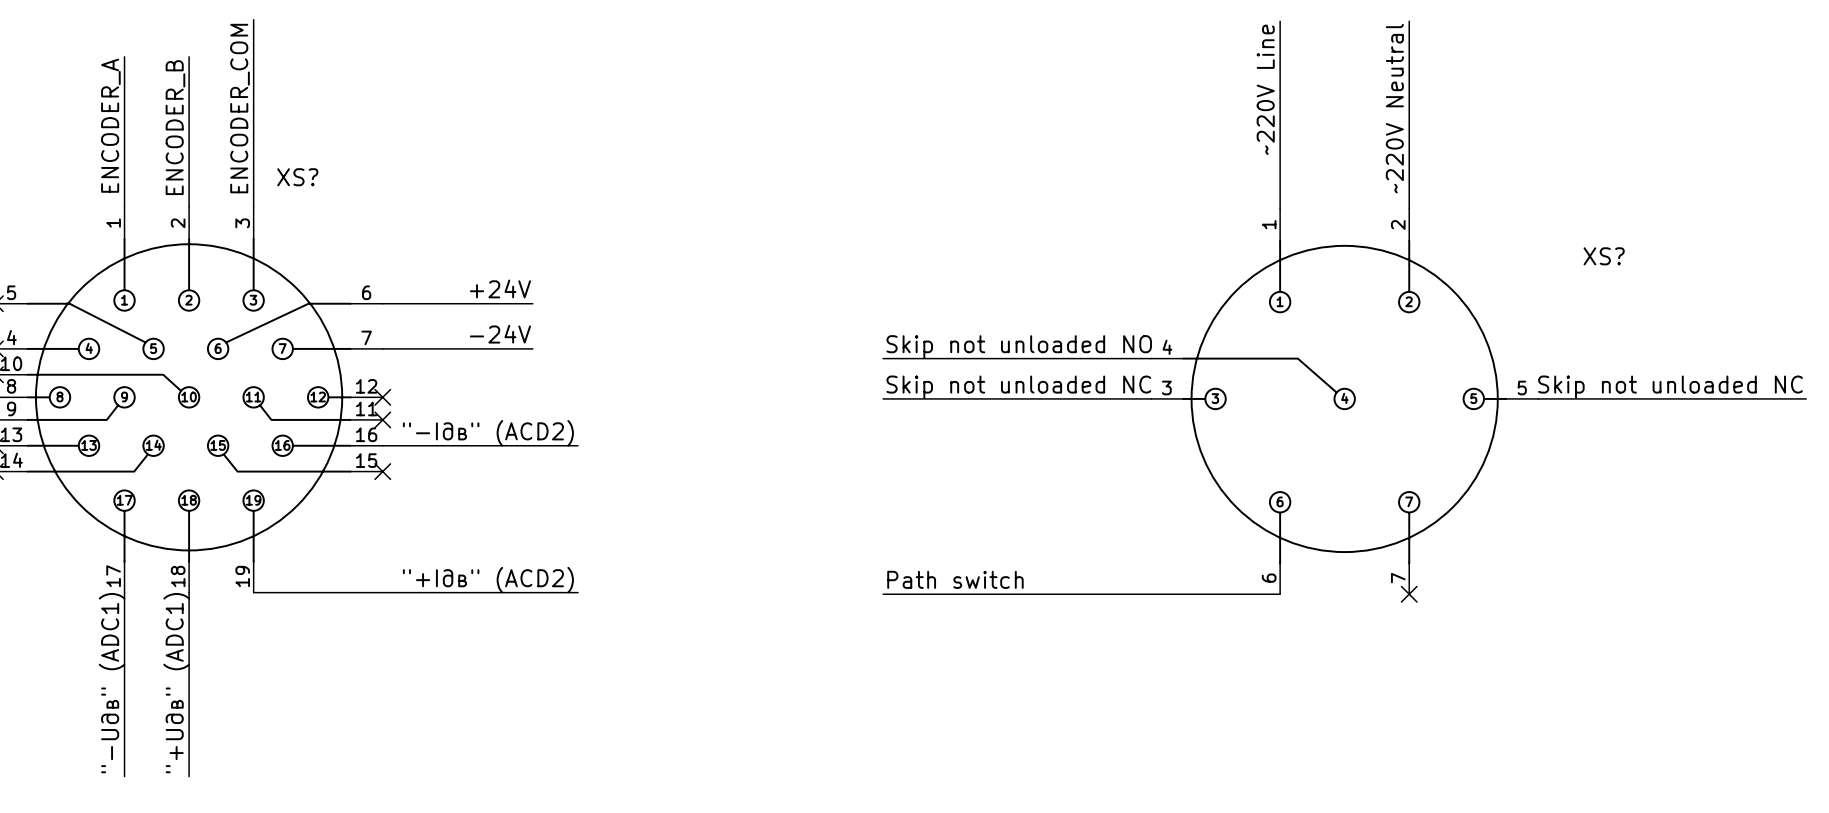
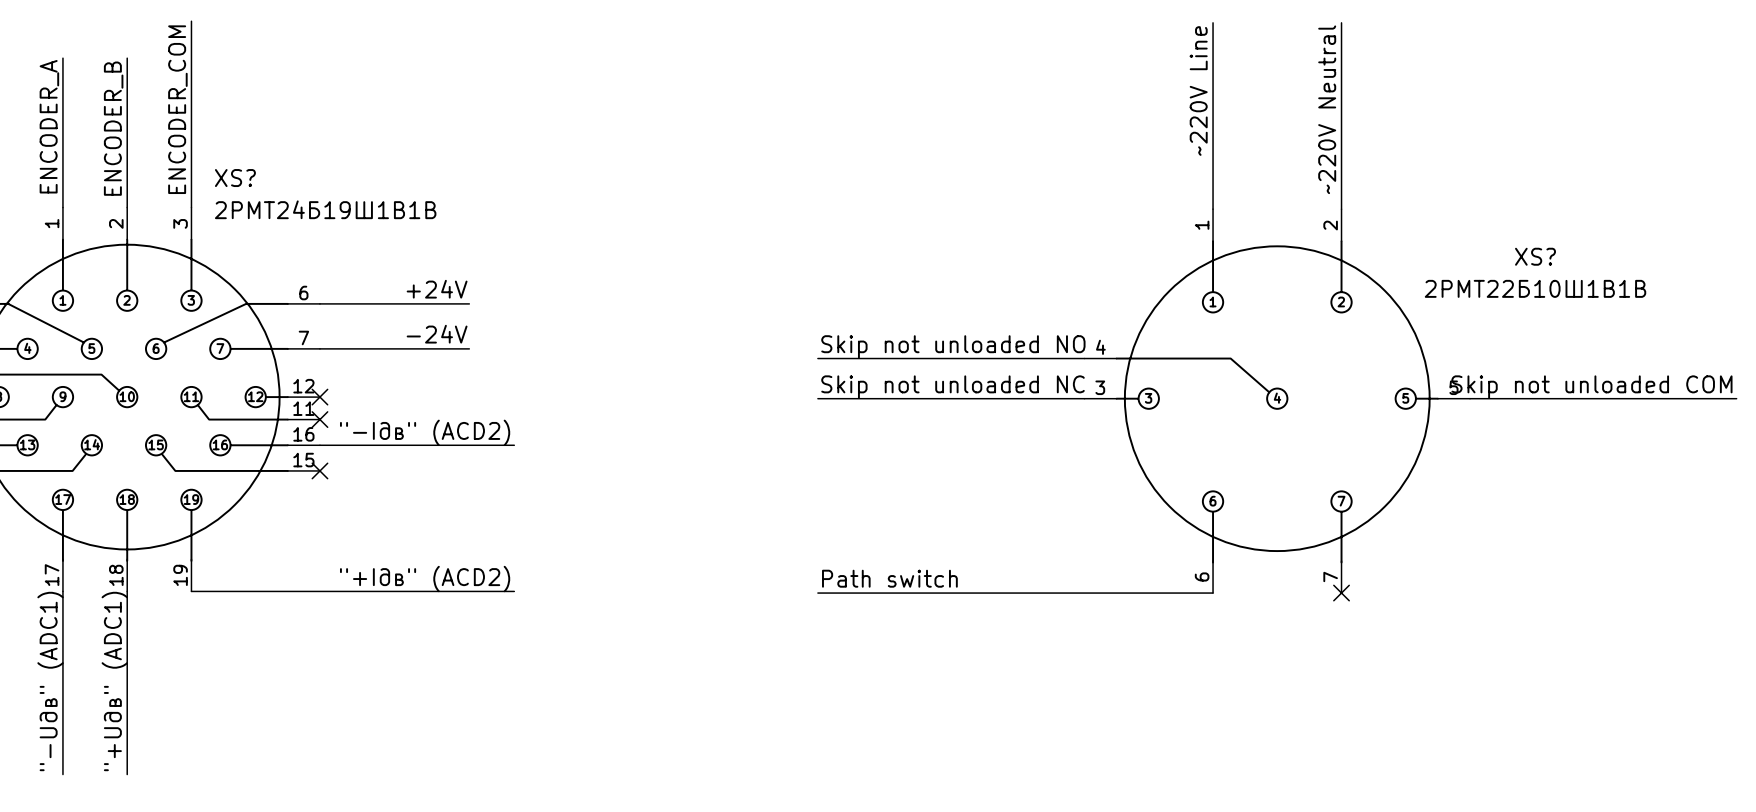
XS? value: none -> 2РМТ24Б19Ш1В1В (325, 209)
XS? value: none -> 2РМТ22Б10Ш1В1В (1535, 288)
label: Skip not unloaded NC (1670, 387) -> Skip not unloaded COM (1591, 387)

